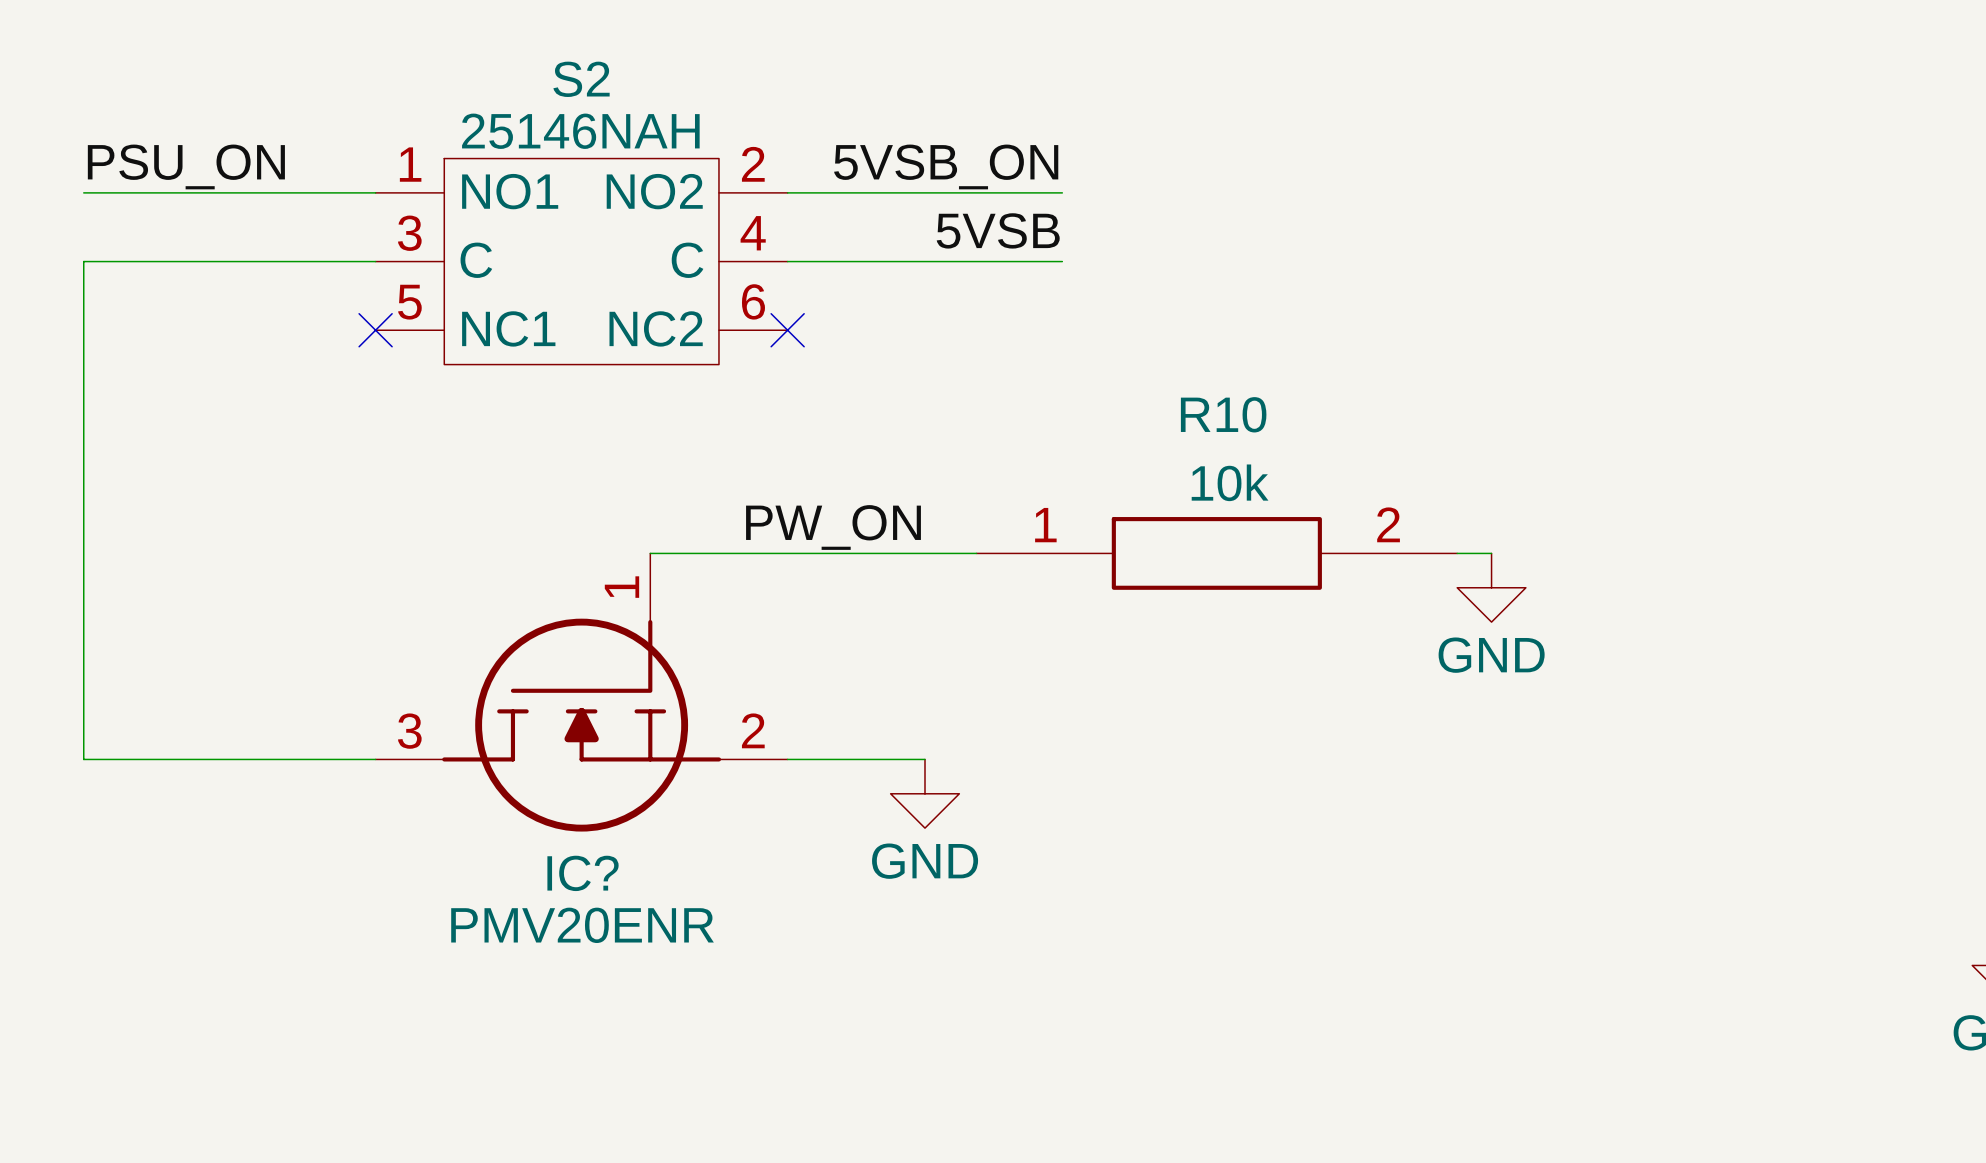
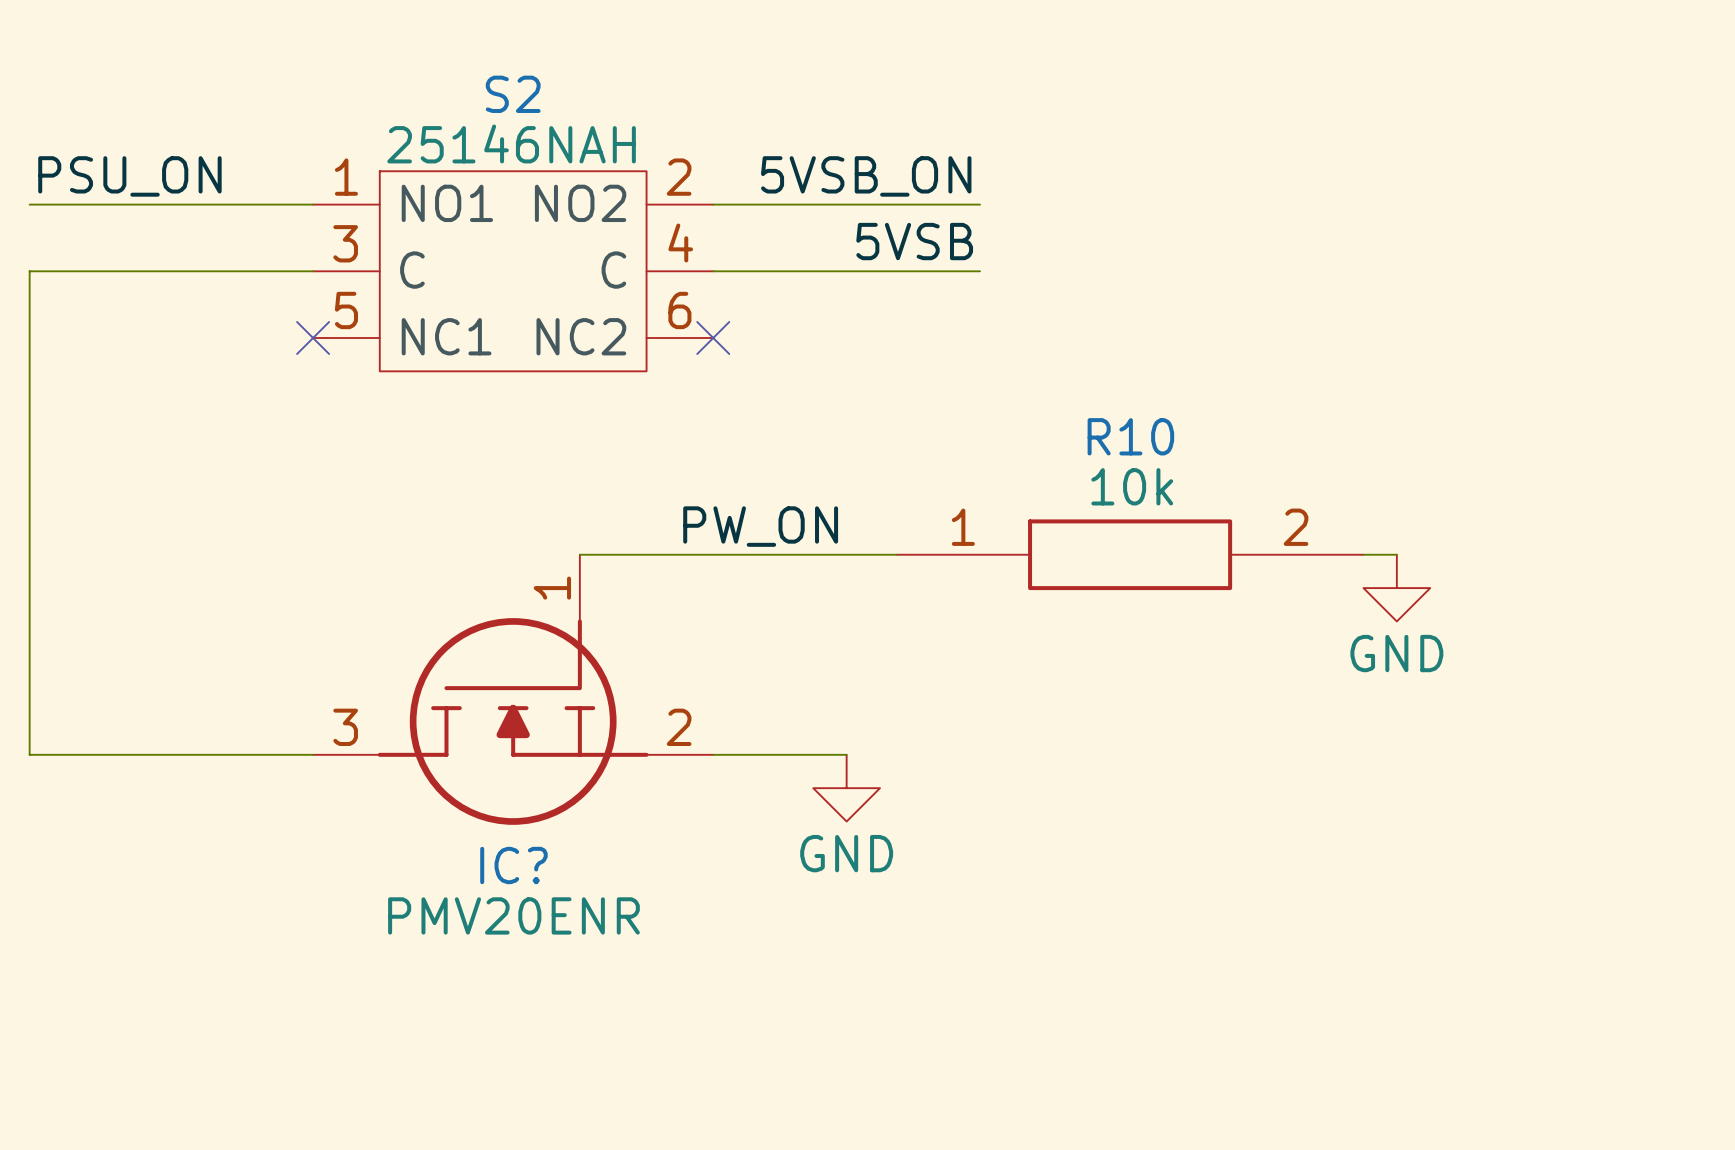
R10 name position: R10 (1223, 414) -> R10 (1130, 436)

